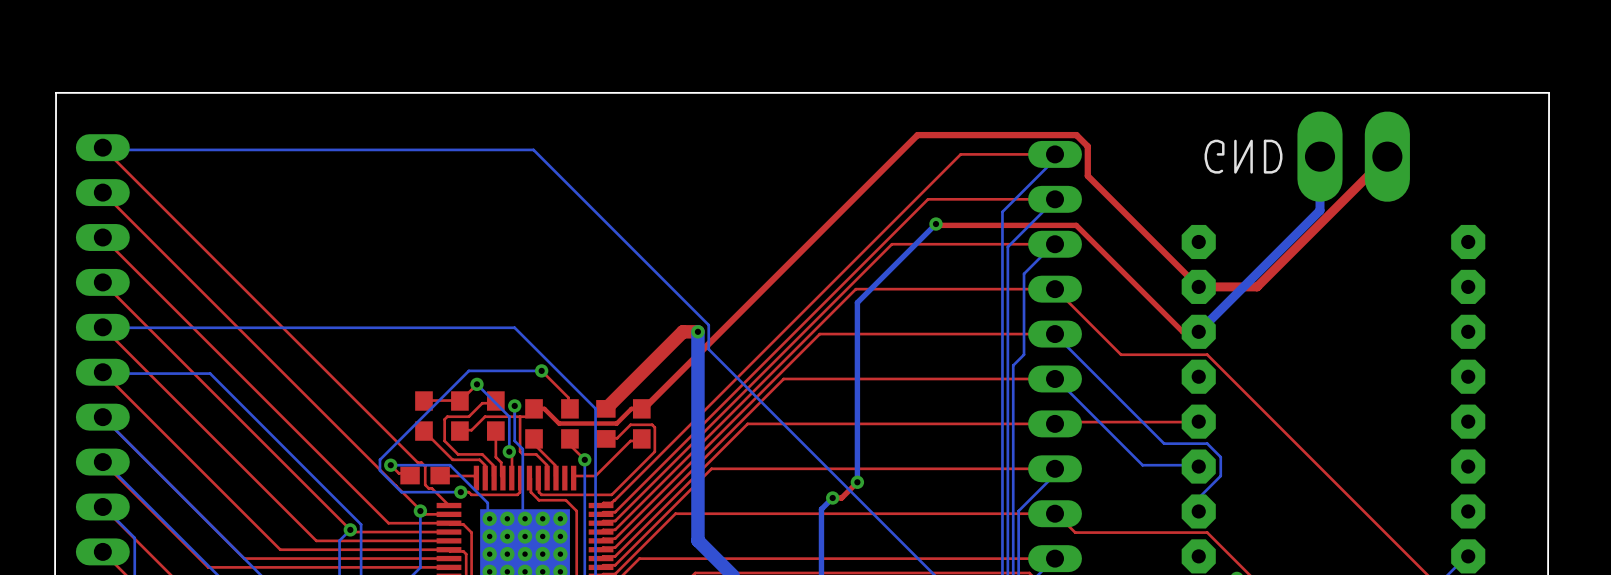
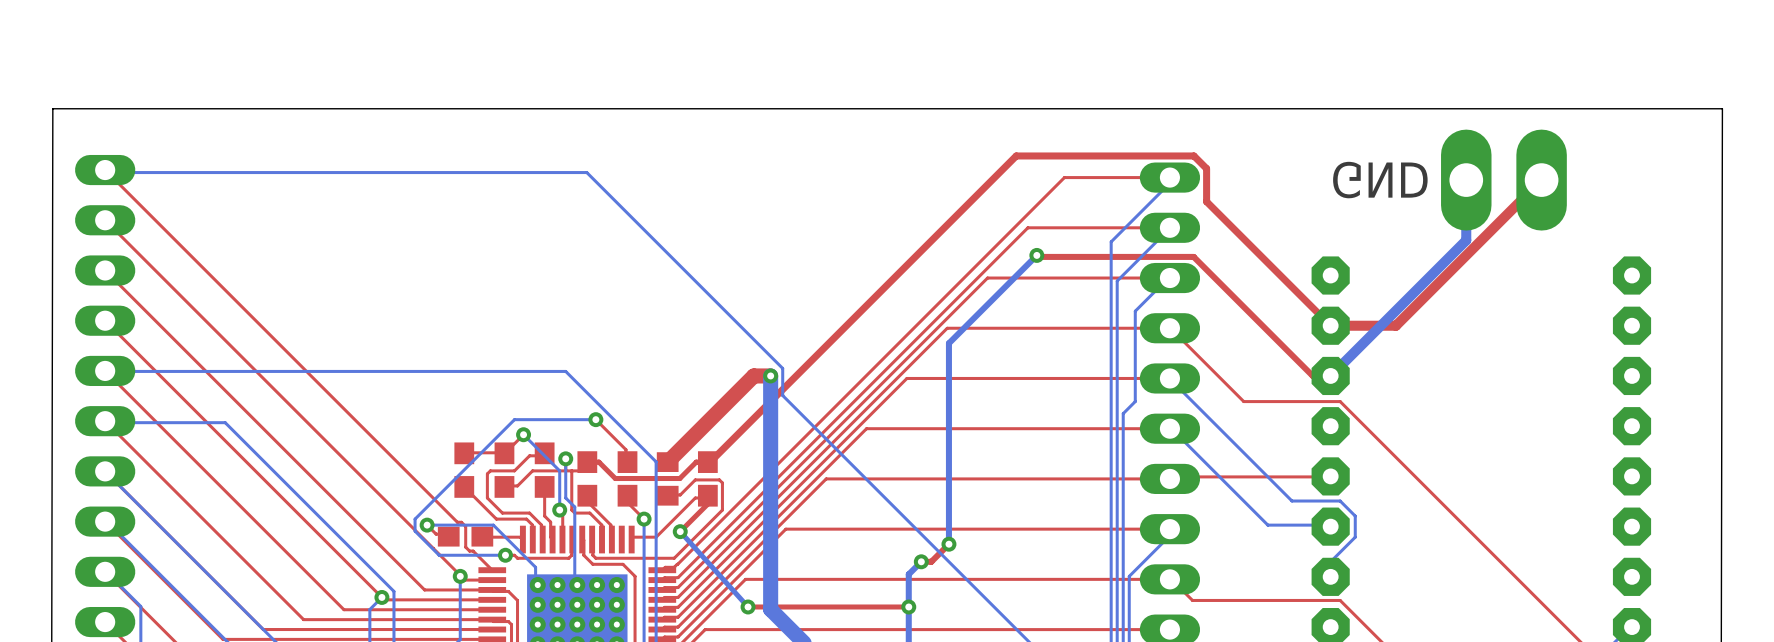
top track: none -> (707, 495) (707, 504) (680, 531)
bottom track: none -> (680, 531) (748, 606)
via: none -> (680, 531)
via: none -> (748, 606)
top track: none -> (908, 606) (748, 606)
via: none -> (908, 606)

